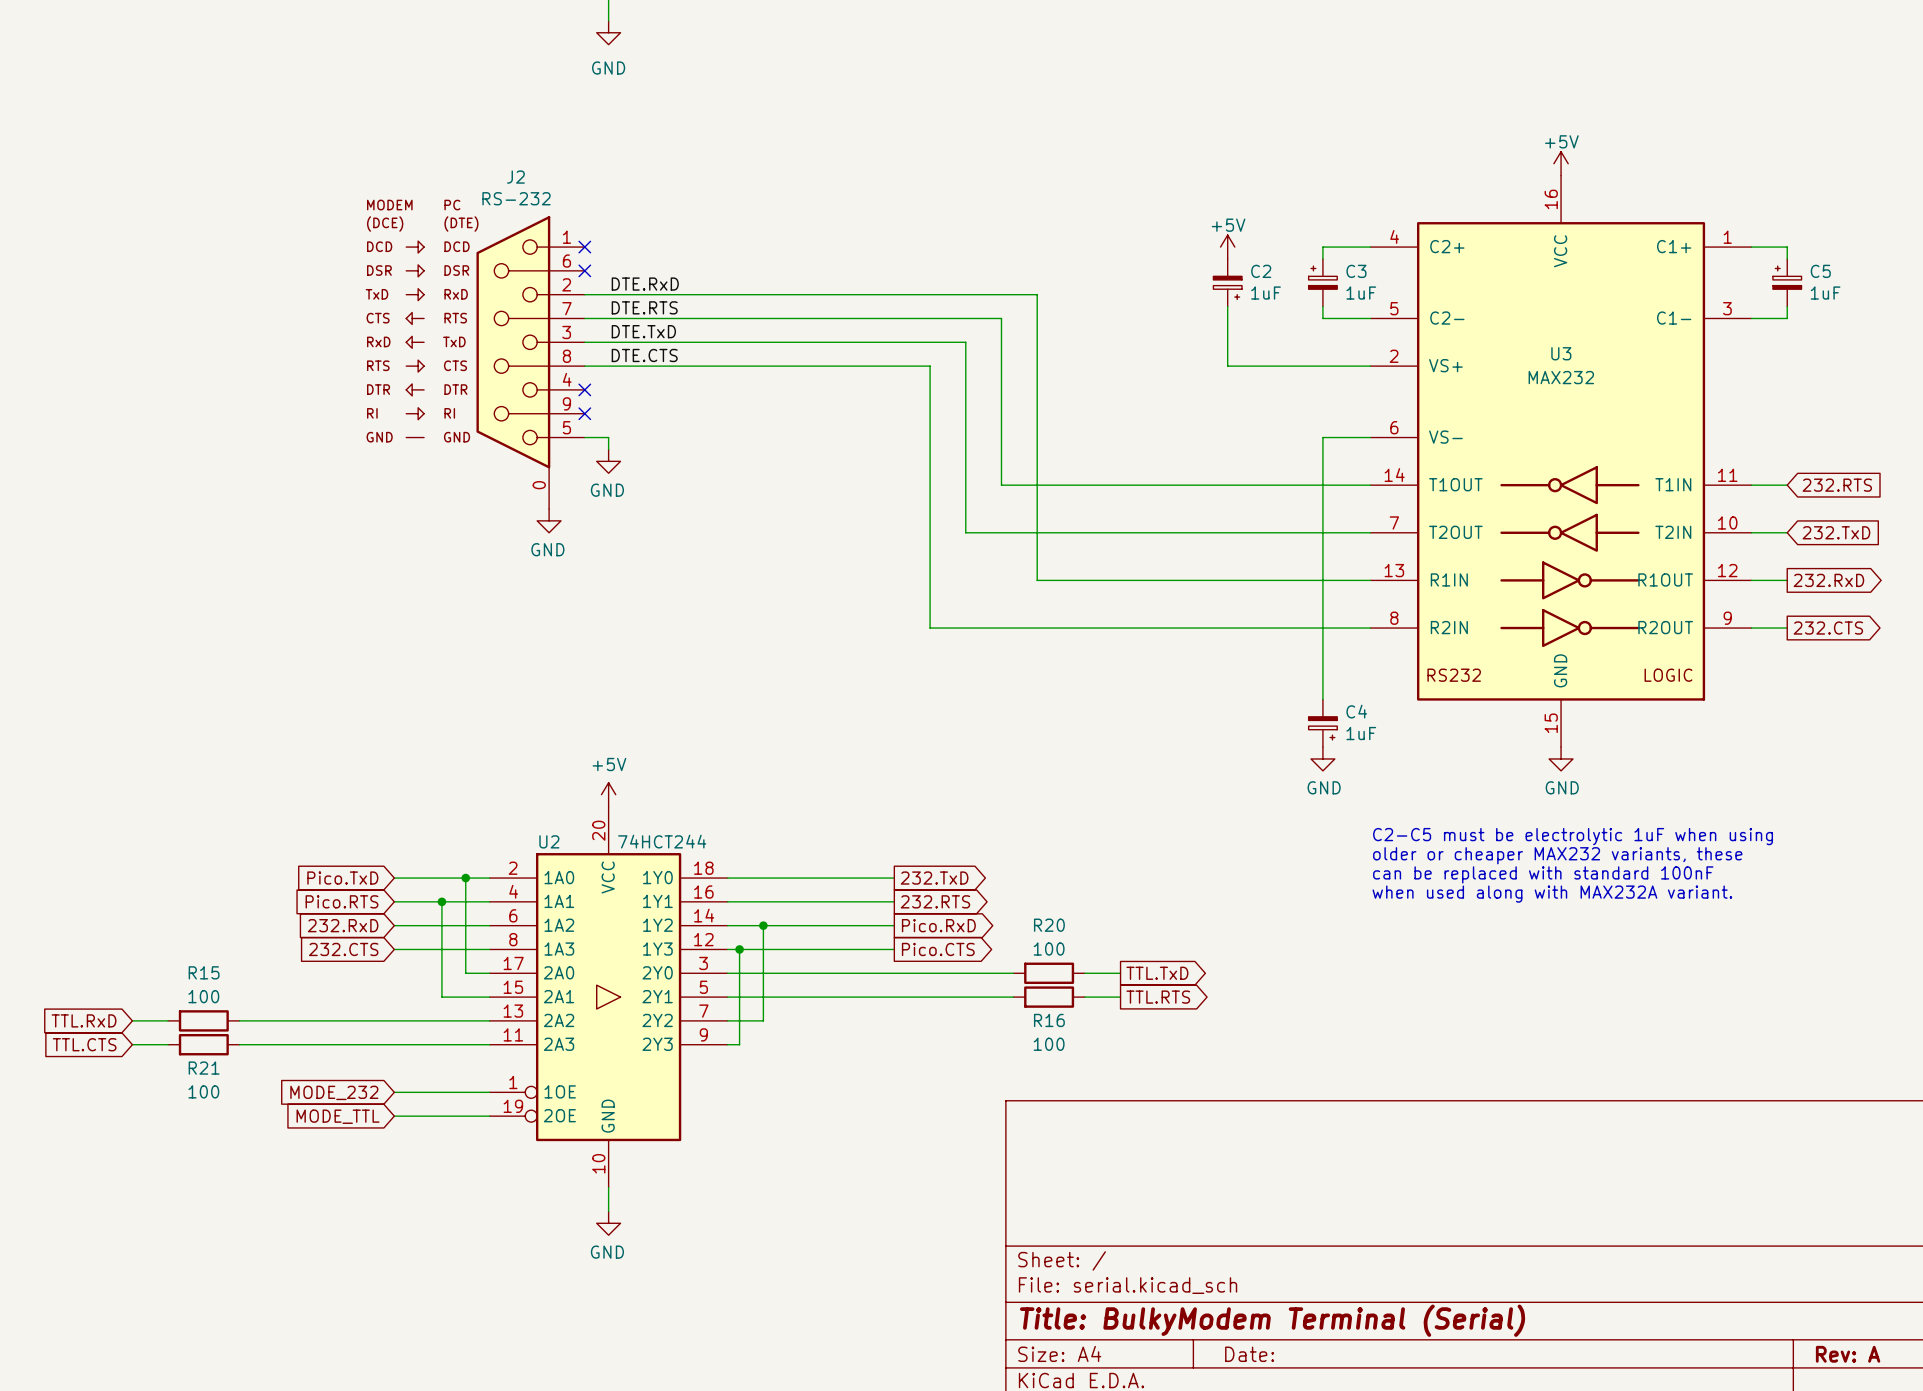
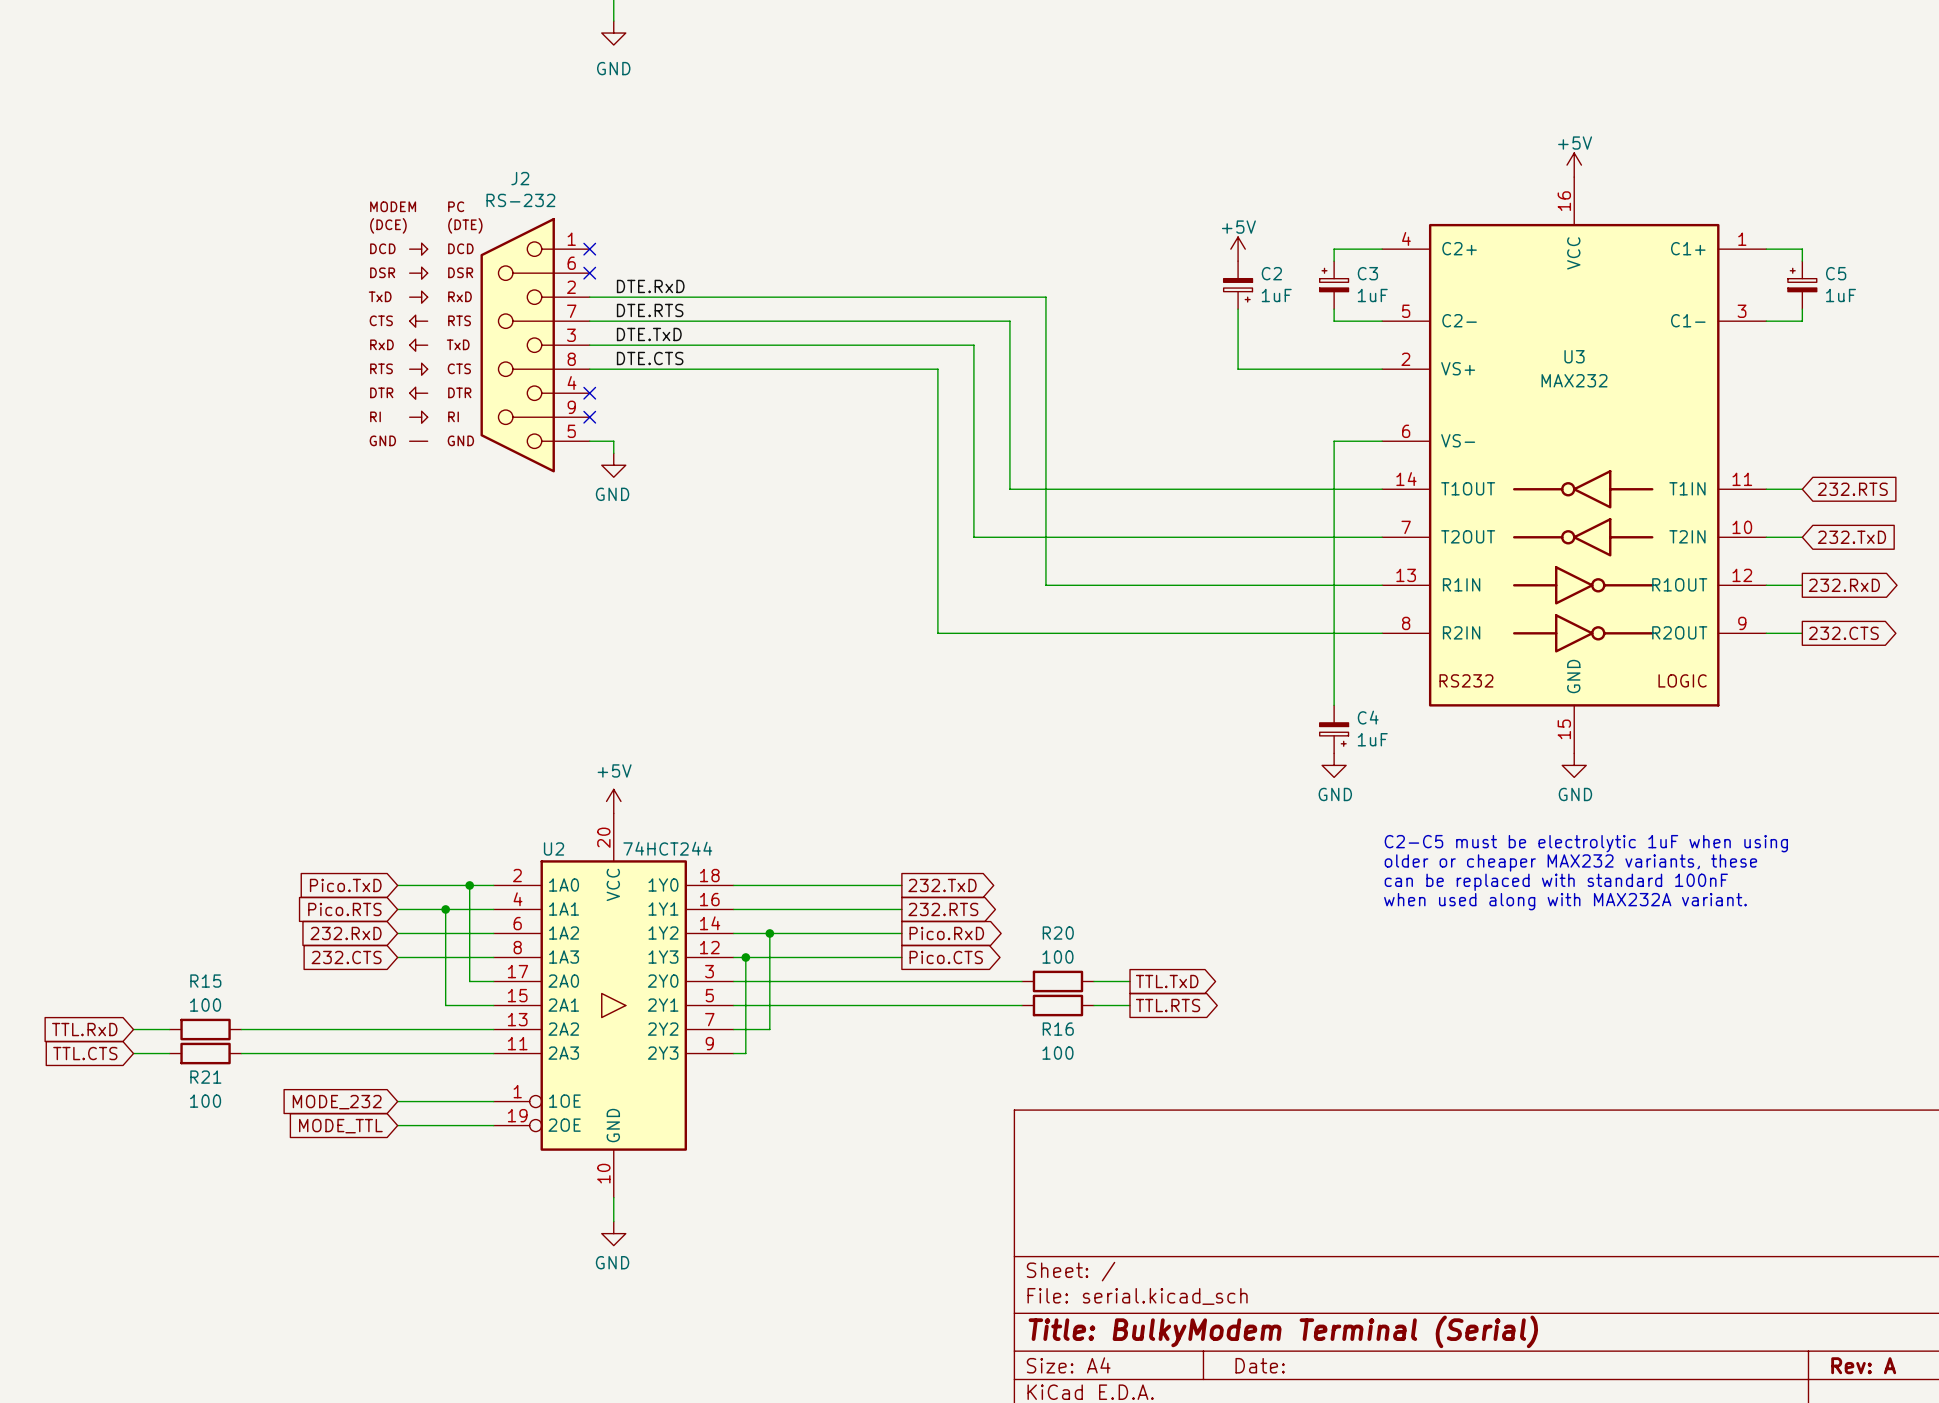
J2 symbol: [406, 216, 585, 509] -> [409, 217, 590, 473]
power symbol: GND (549, 520) -> none

